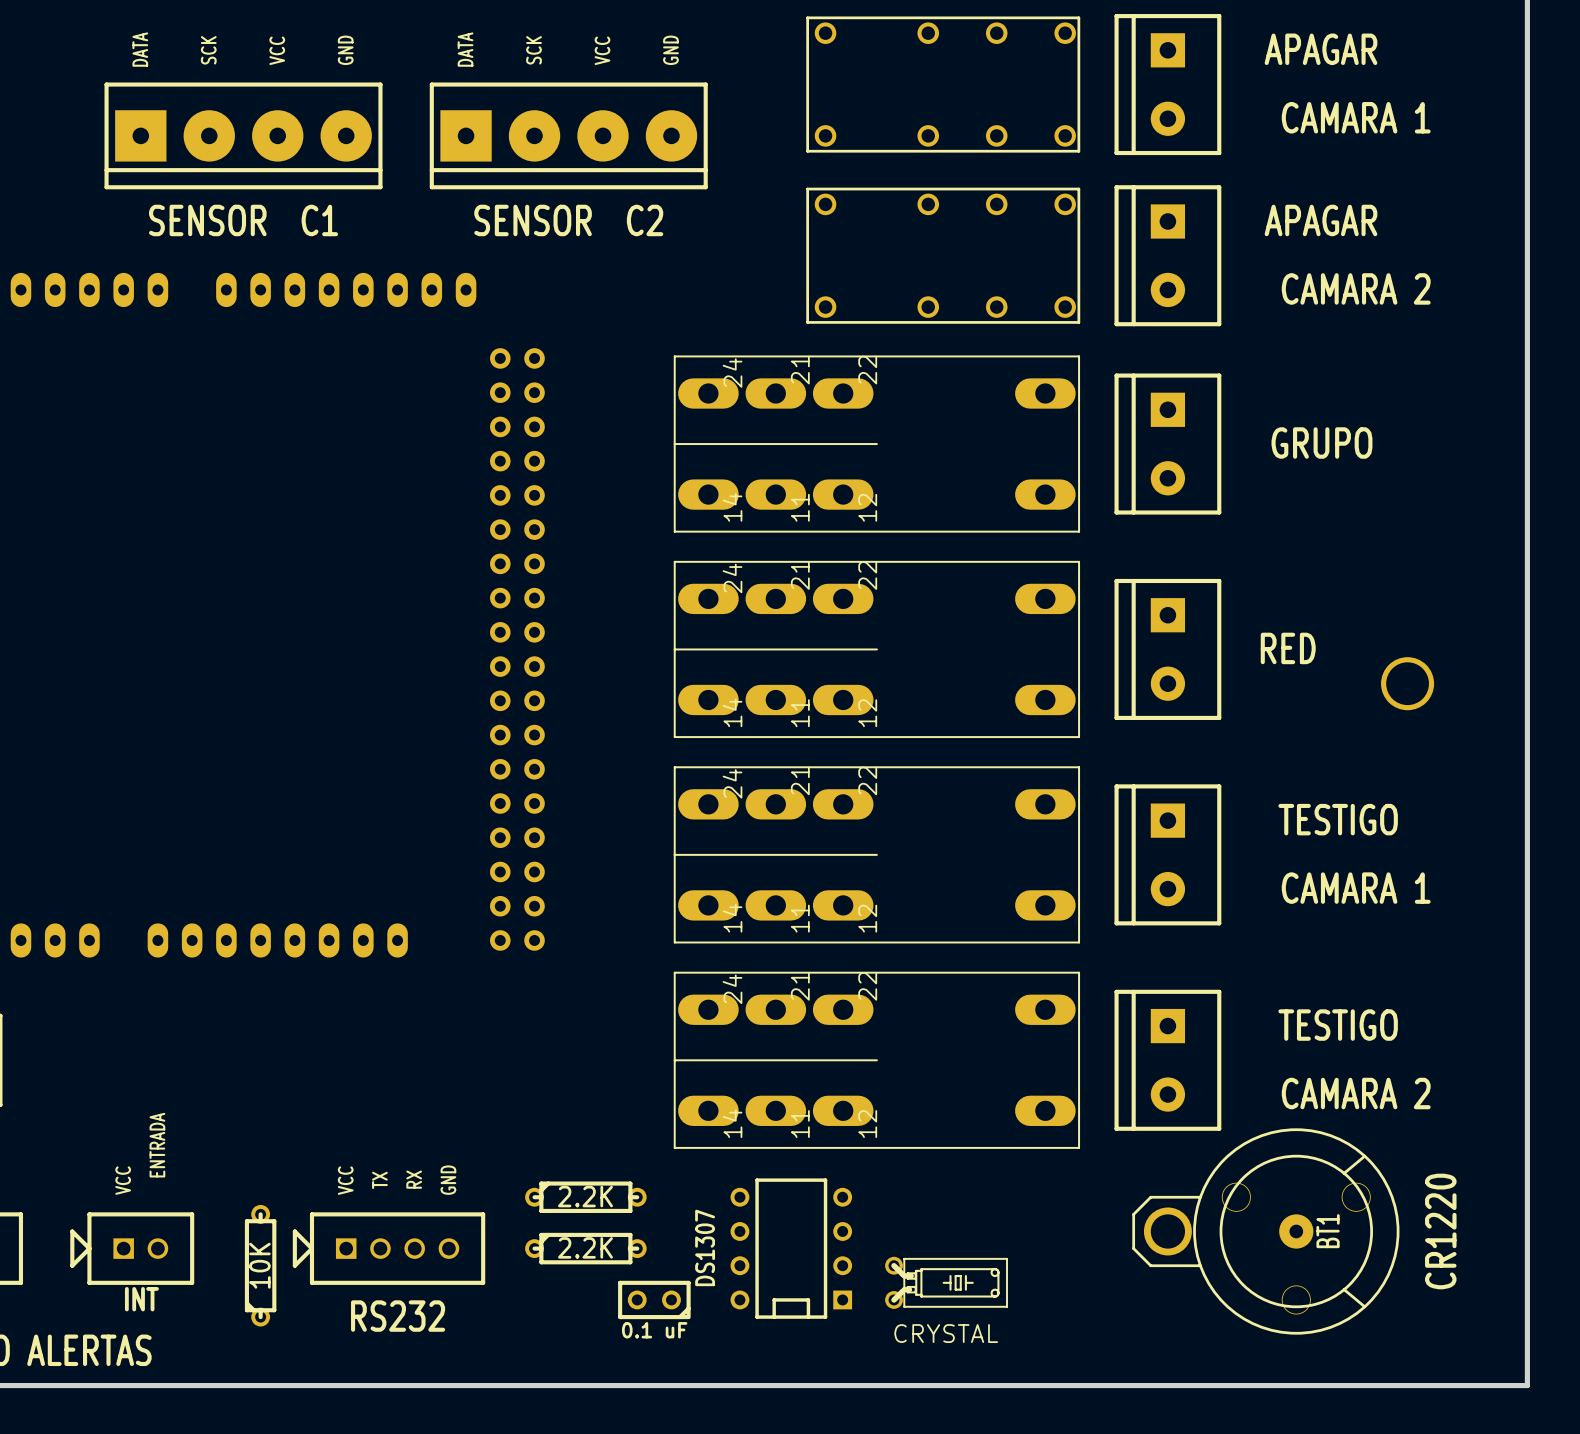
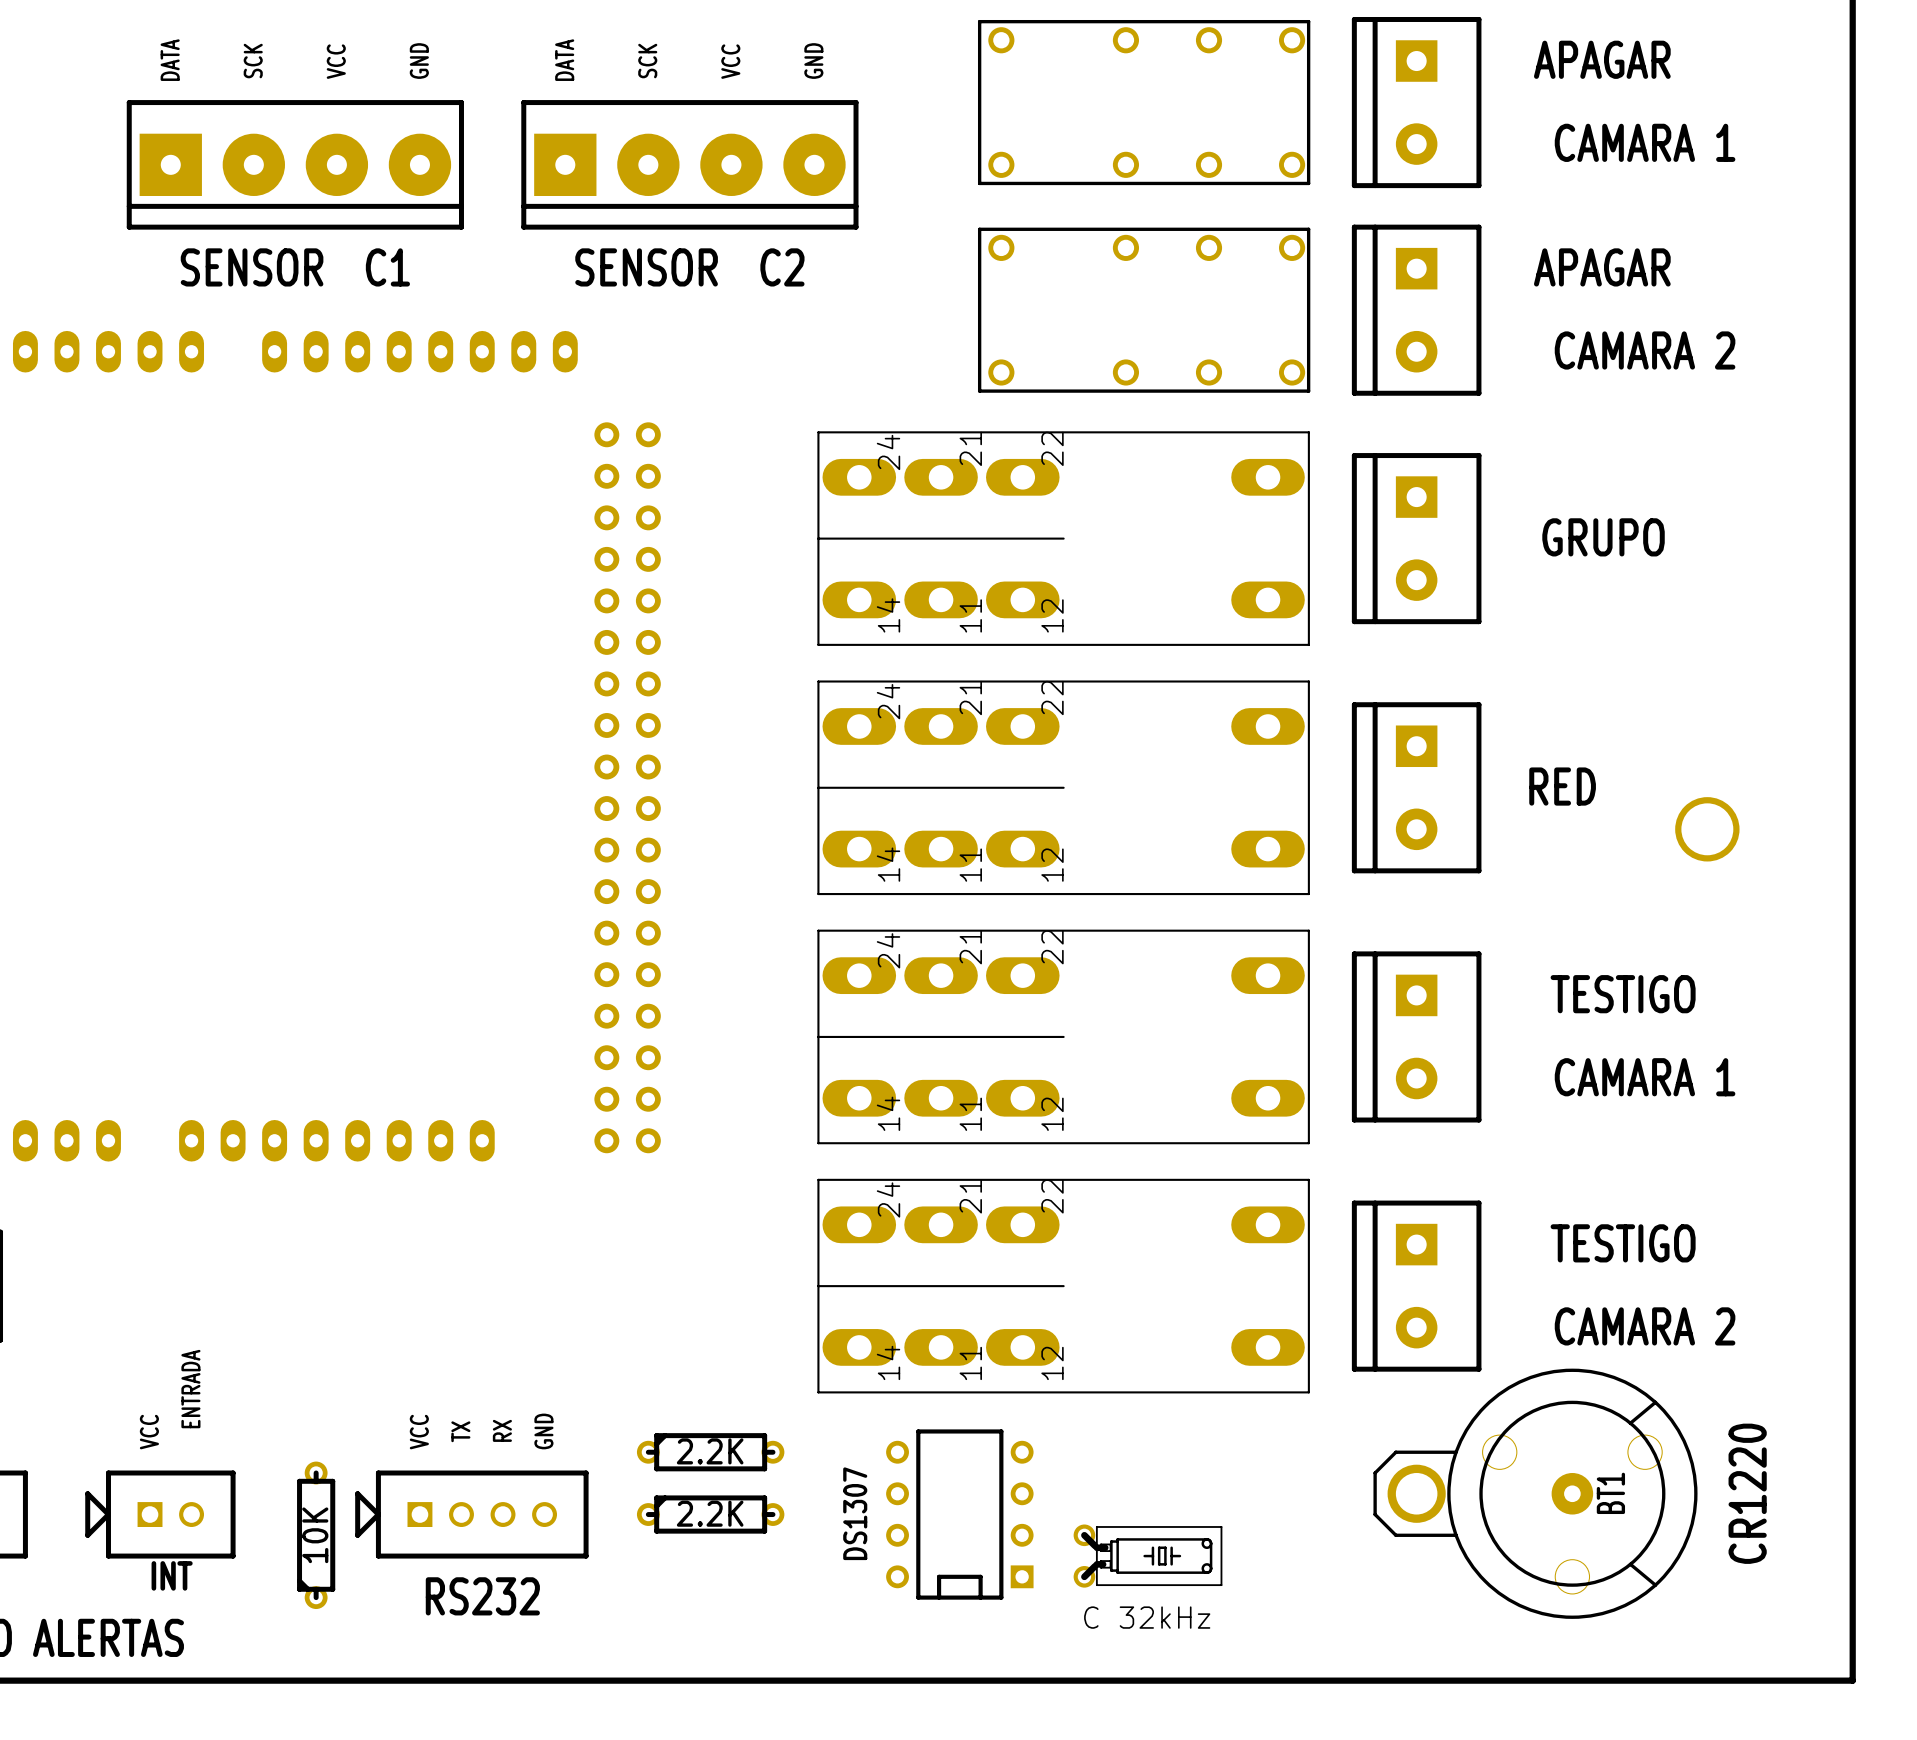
part: 0.1 uF (654, 1299) -> none
part value: CRYSTAL (946, 1333) -> C 32kHz (1147, 1617)

